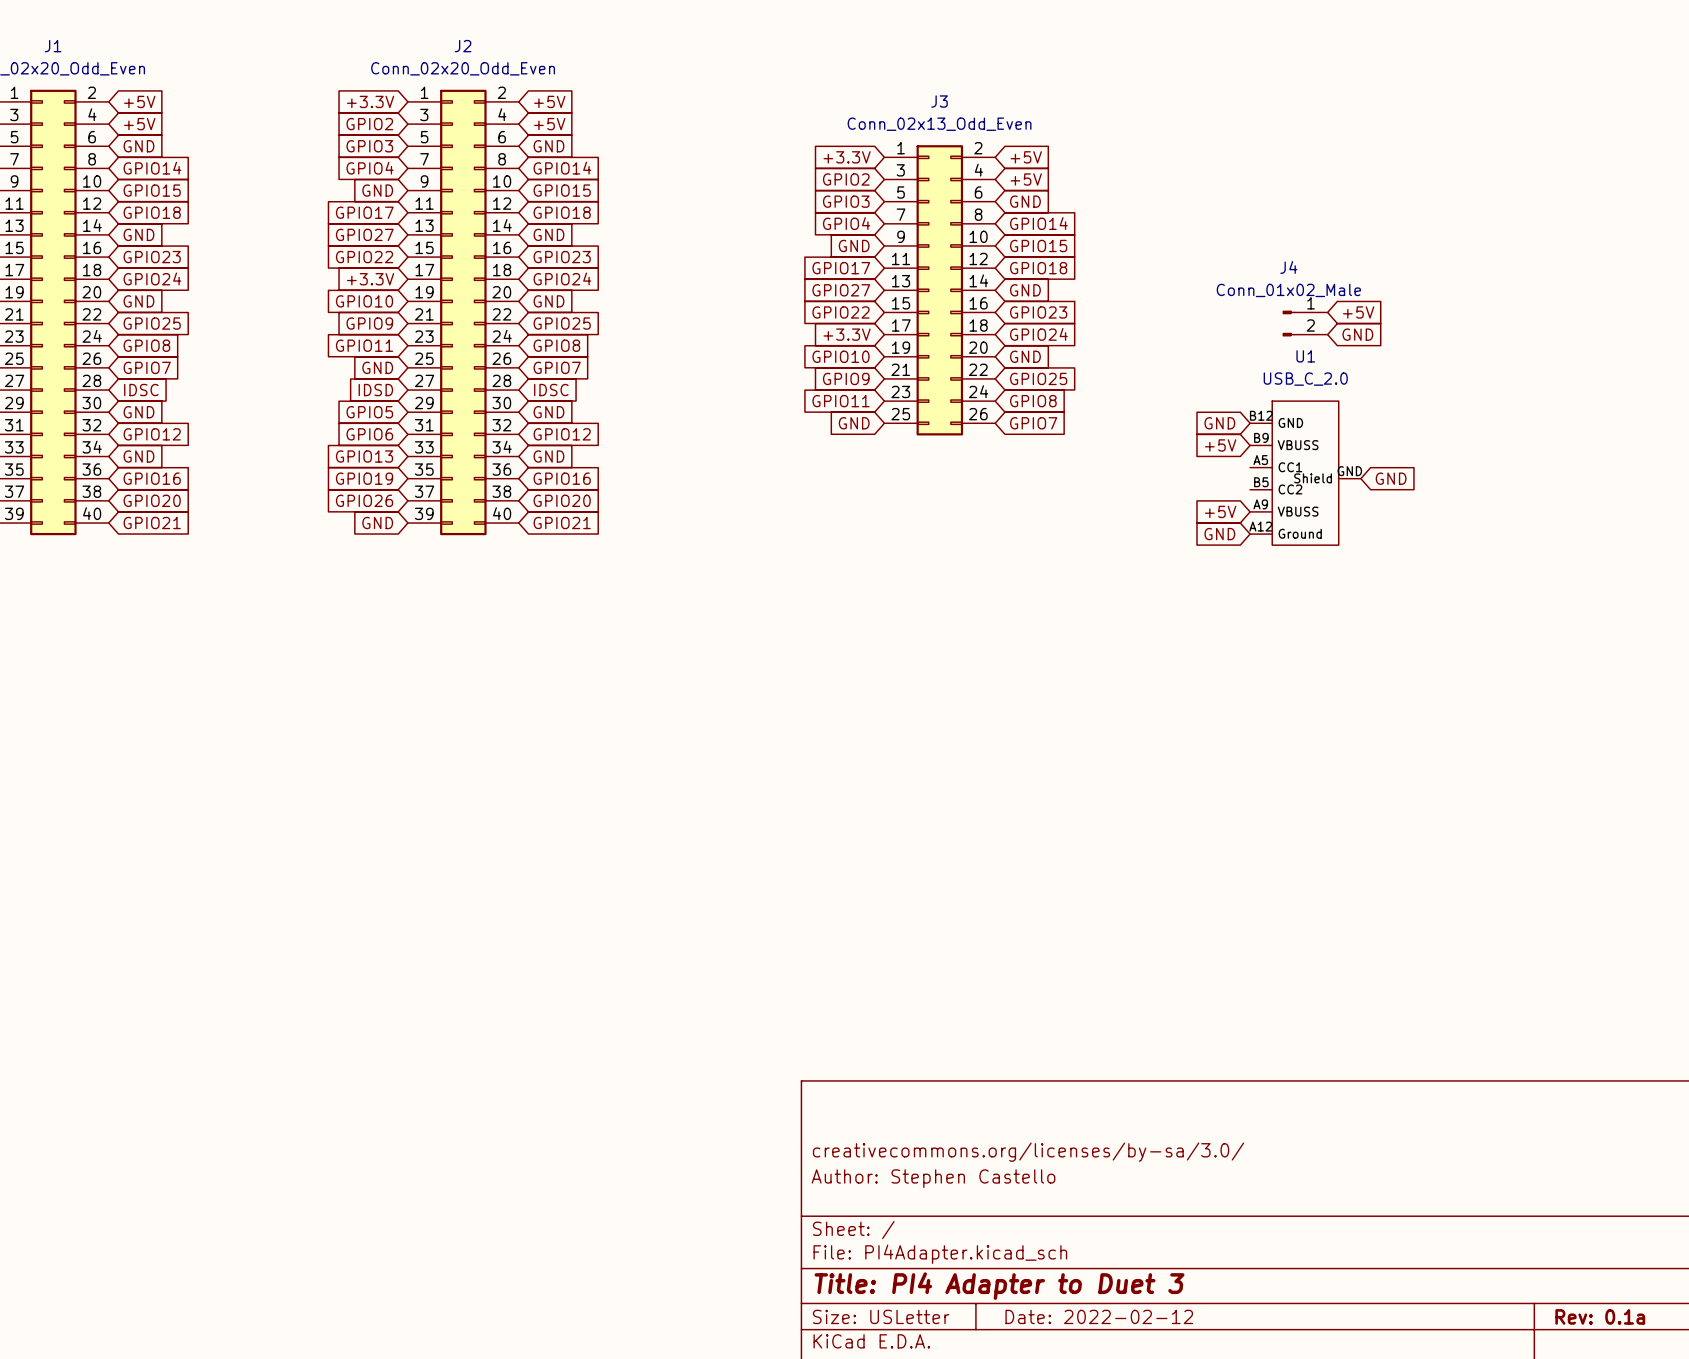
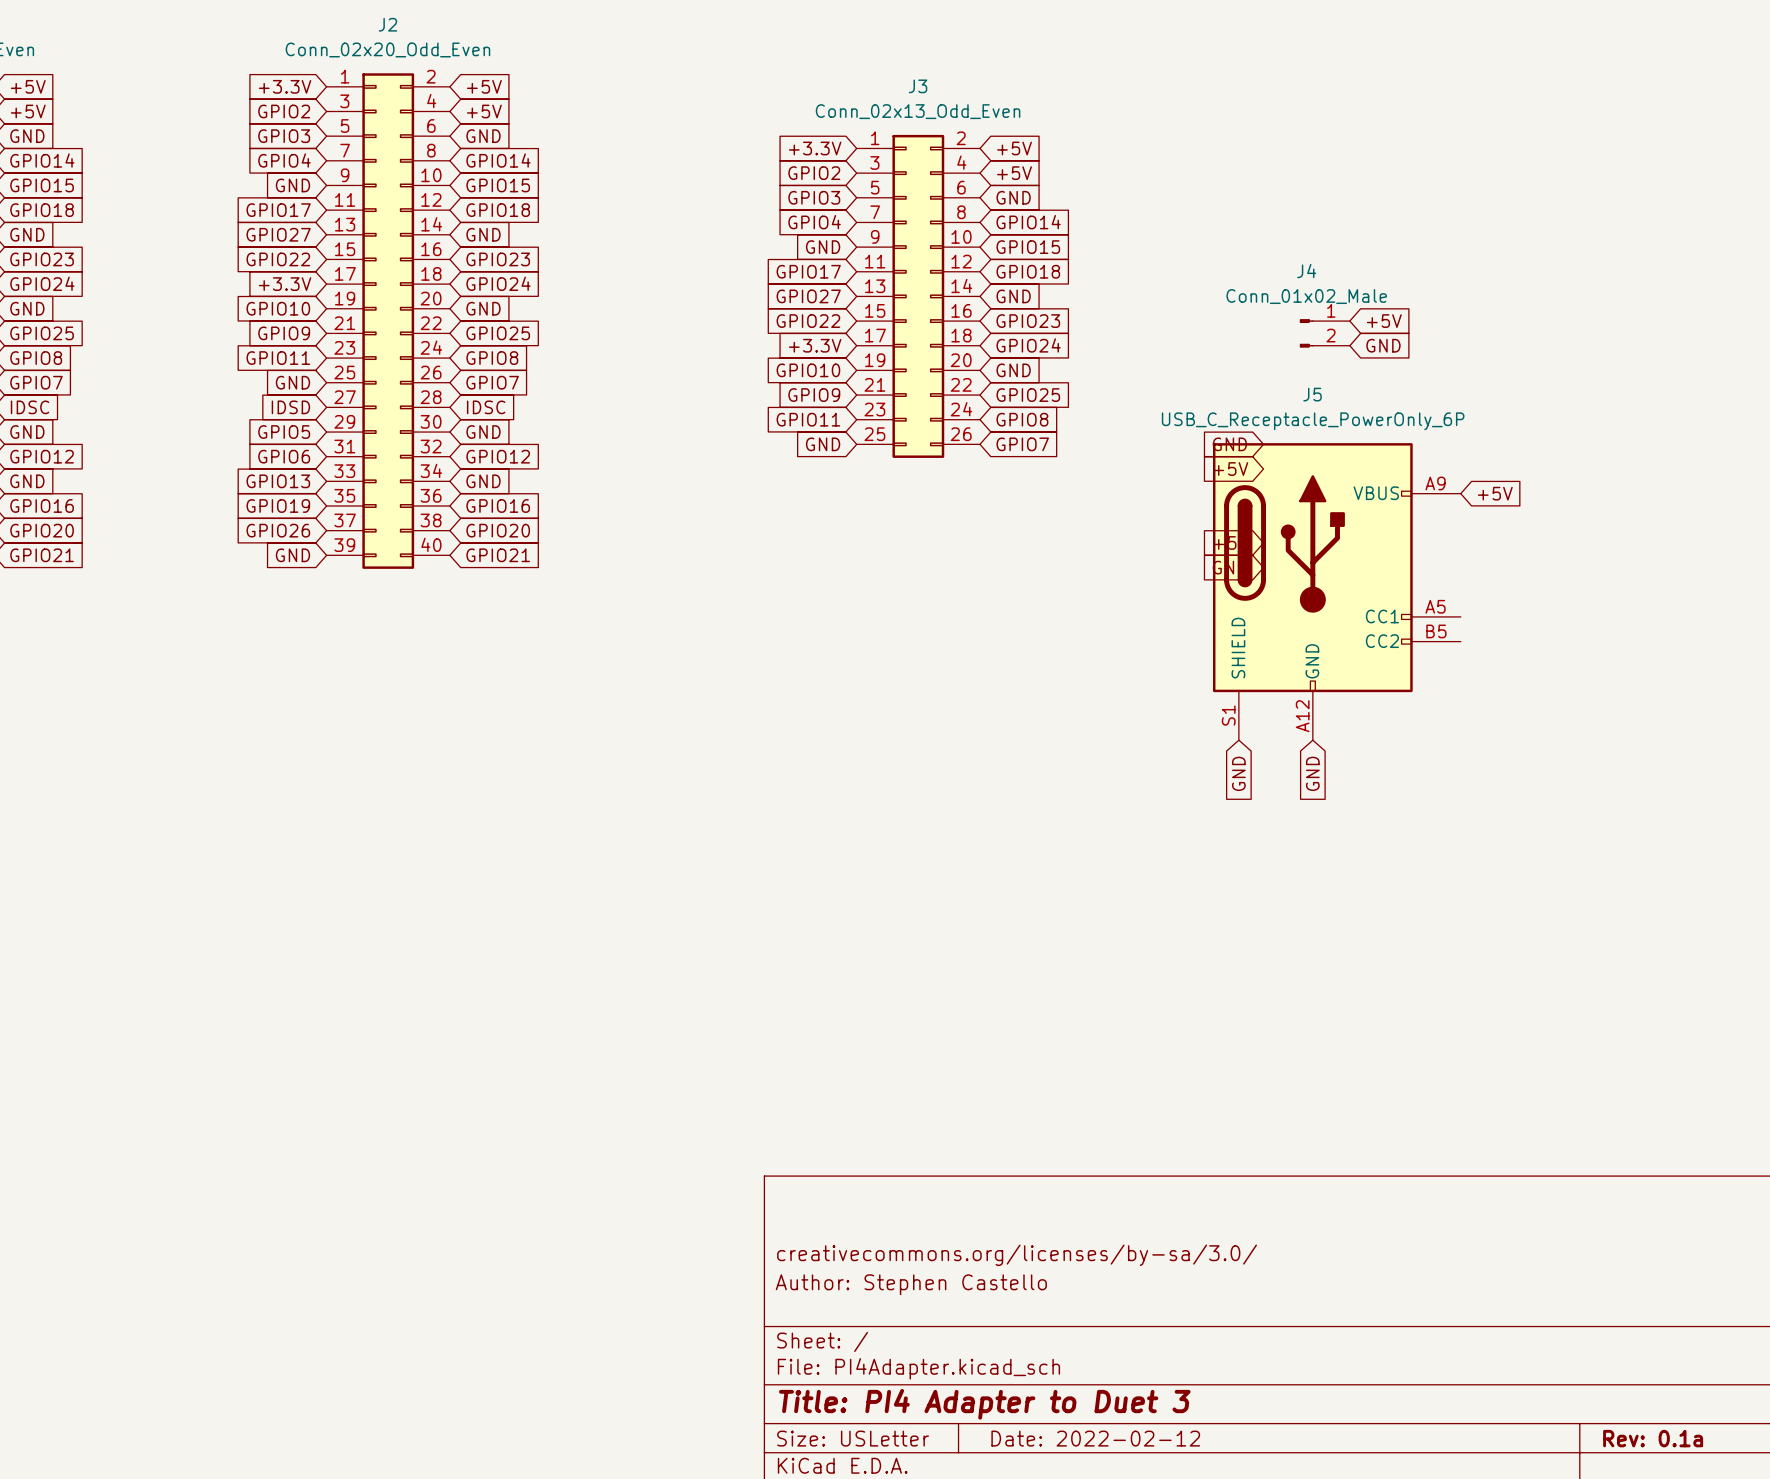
global label: none -> +5V (1495, 493)
U1: USB_C_2.0 (1305, 473) -> none
global label: GND (1391, 478) -> none
J5: none -> USB_C_Receptacle_PowerOnly_6P (1336, 591)
global label: none -> GND (1238, 773)
global label: none -> GND (1312, 773)

